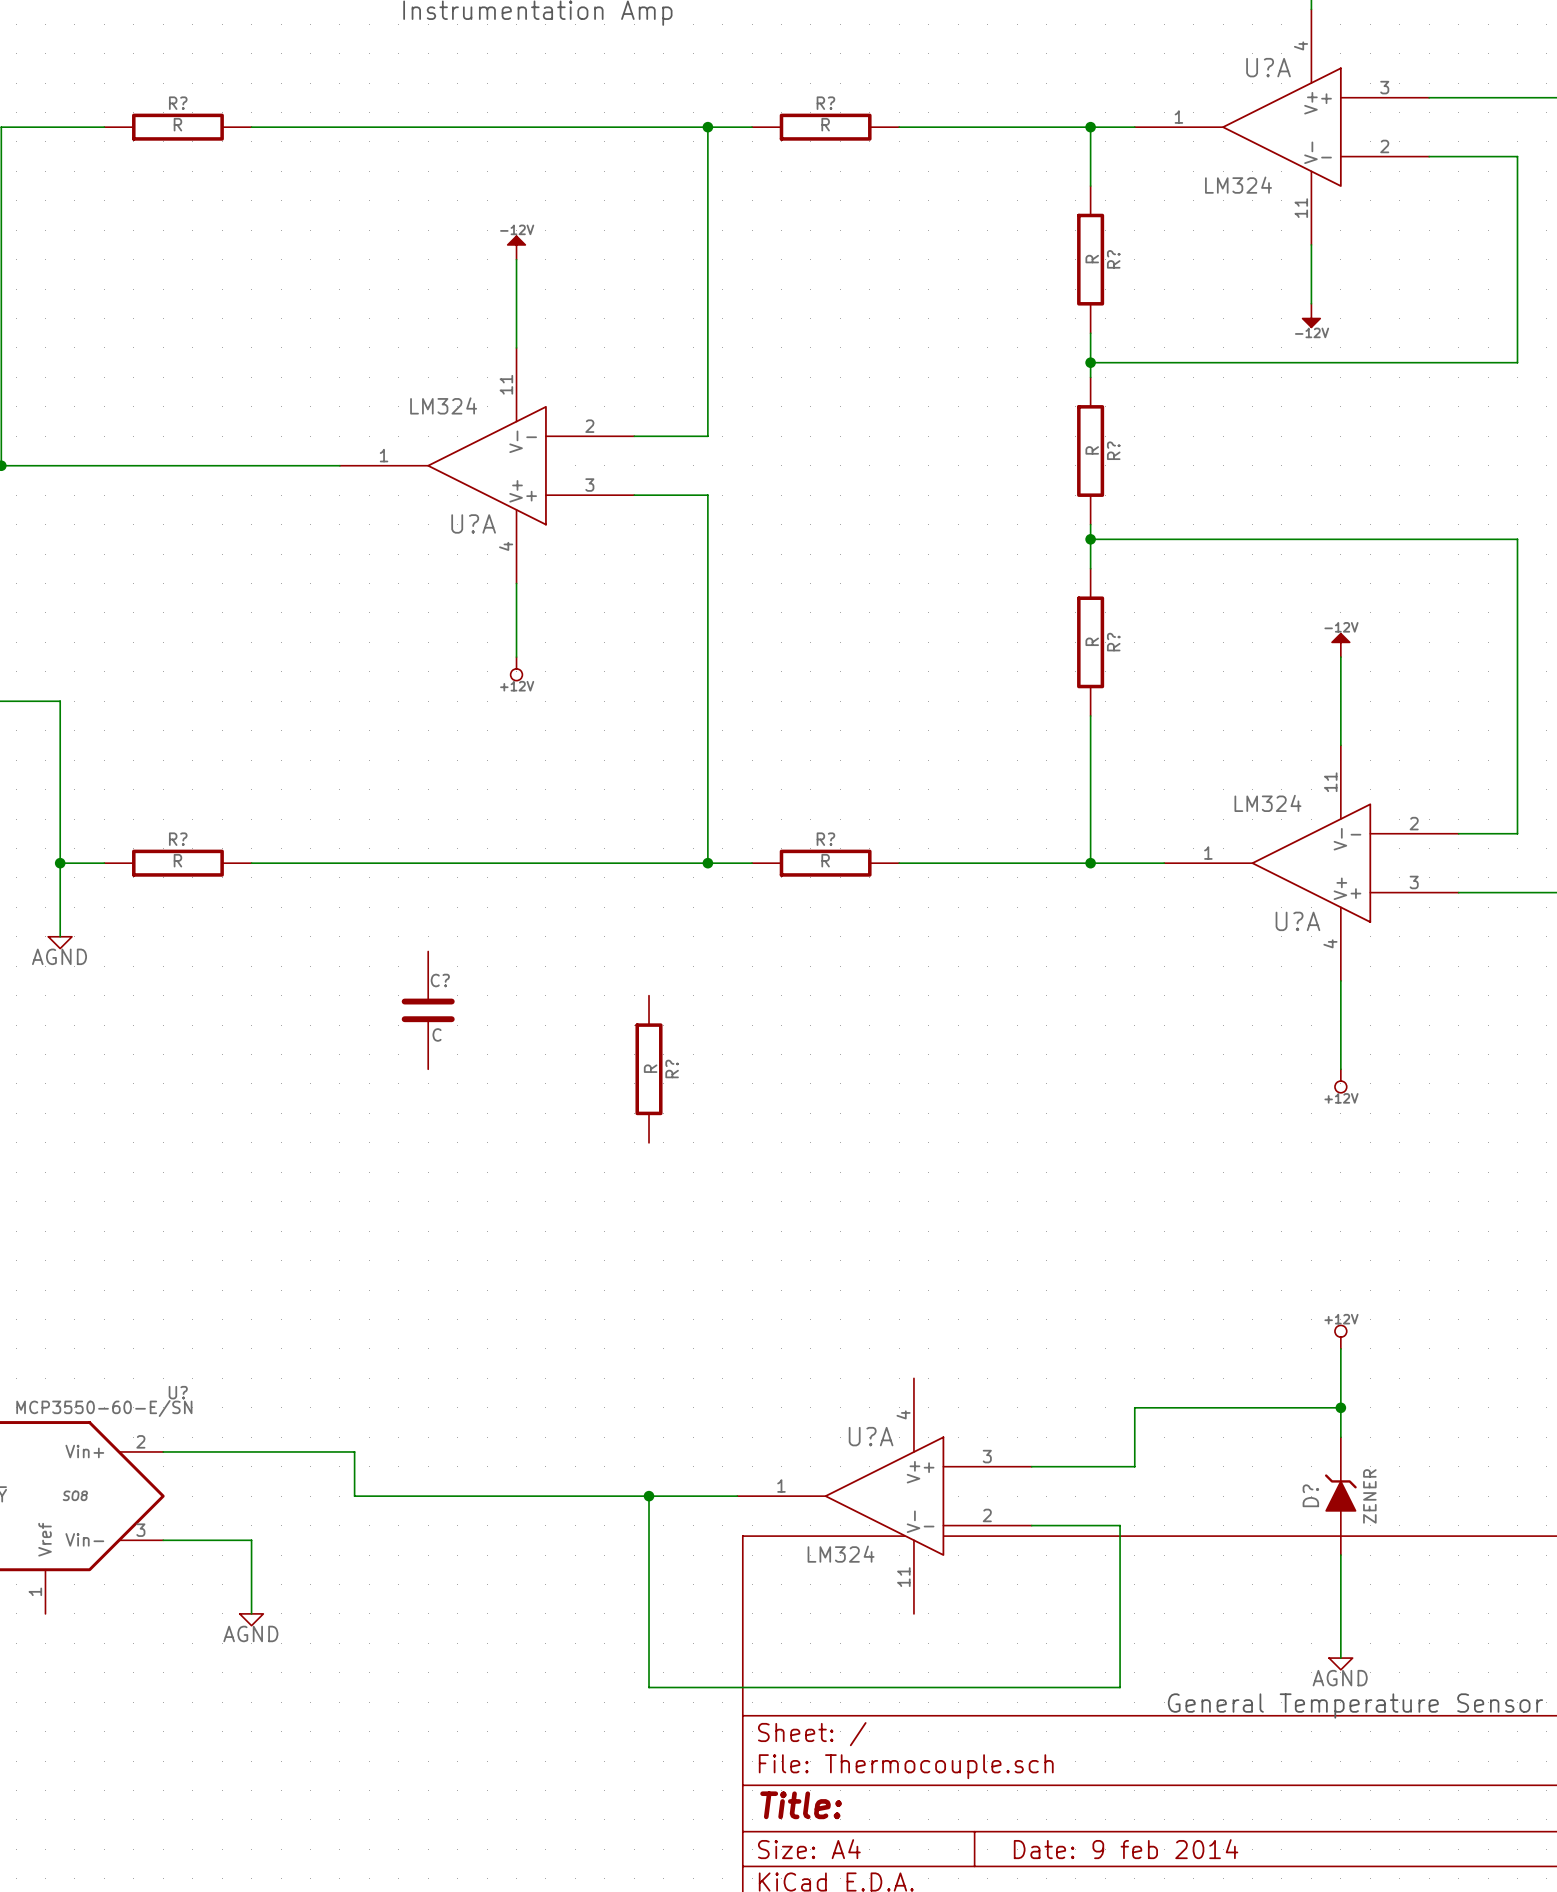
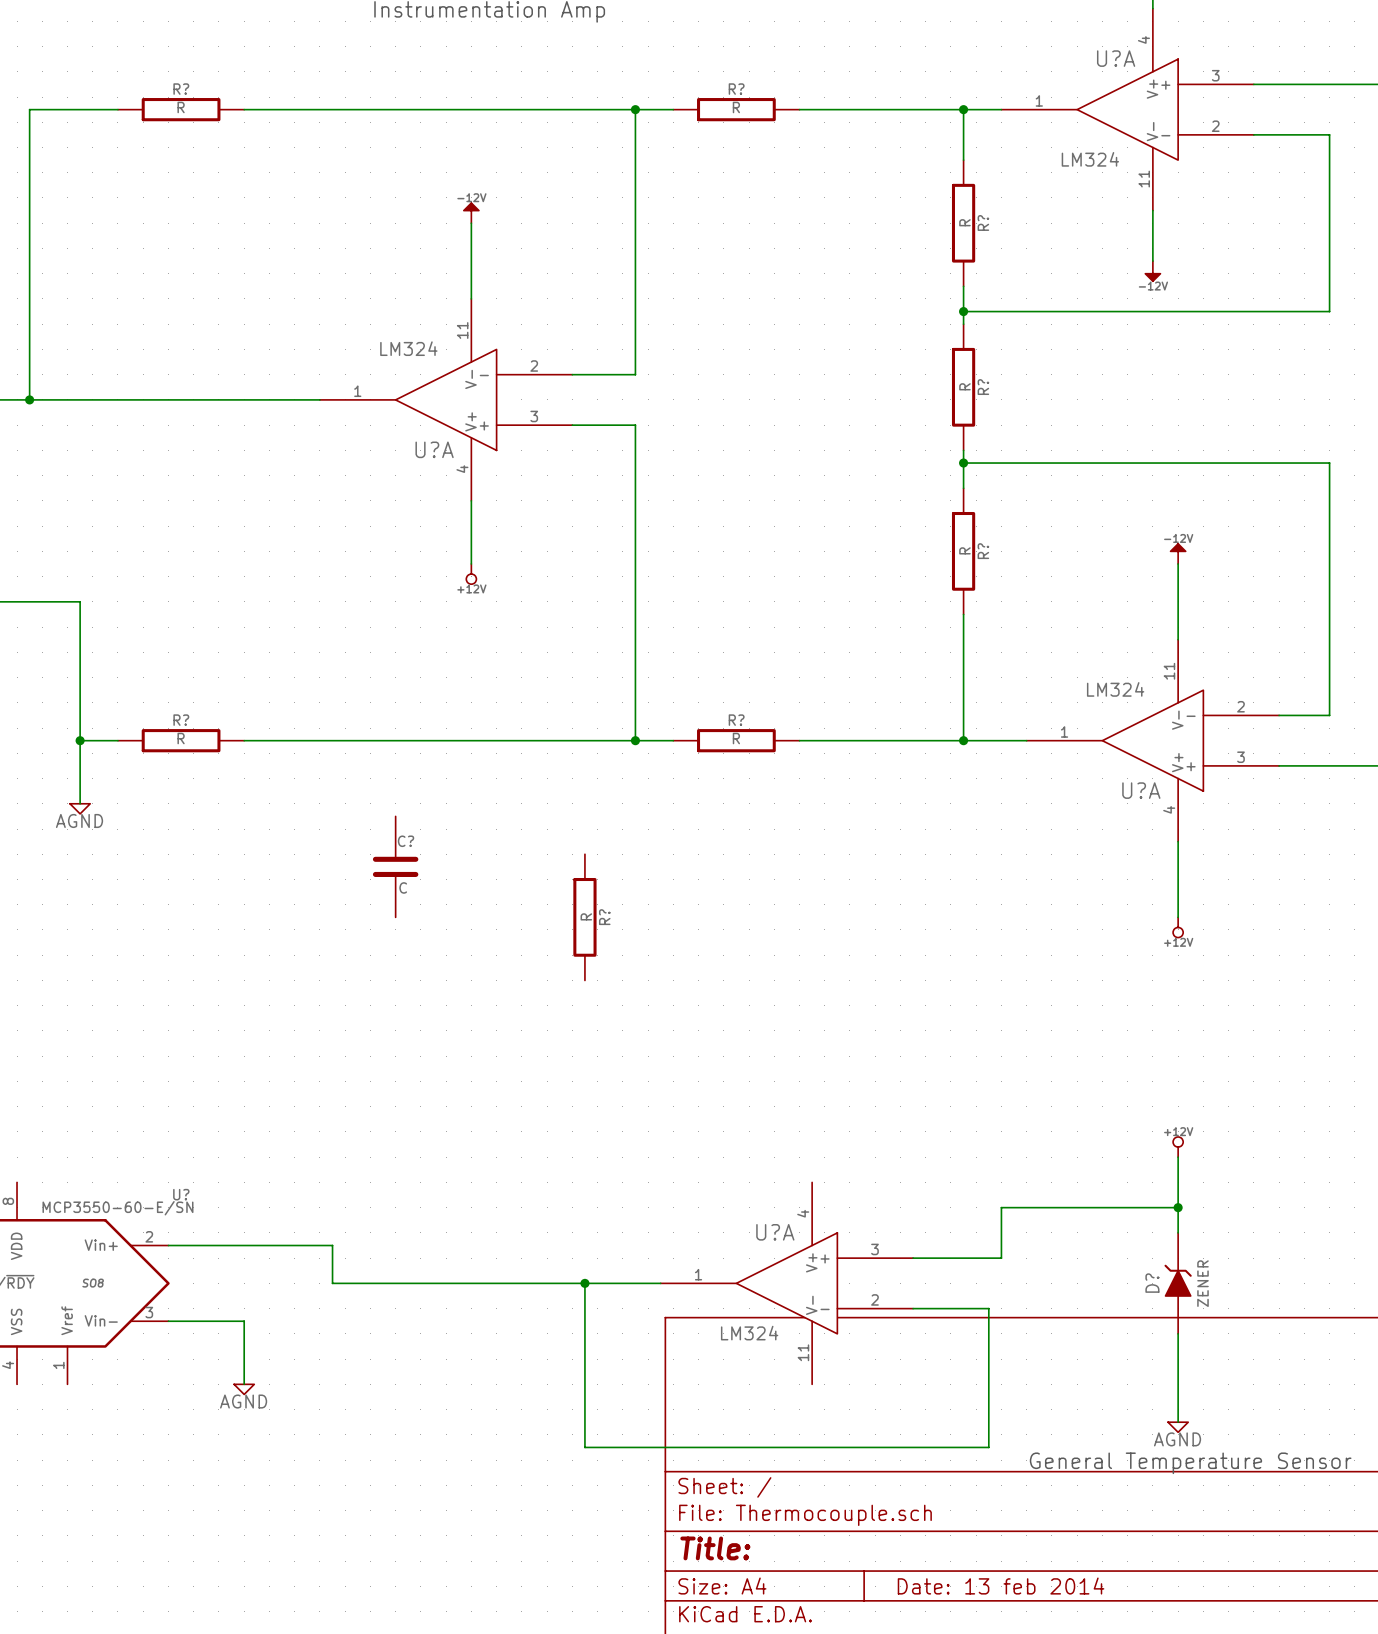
title block: Date: 9 feb 2014 (1126, 1849) -> Date: 13 feb 2014 (1001, 1586)

